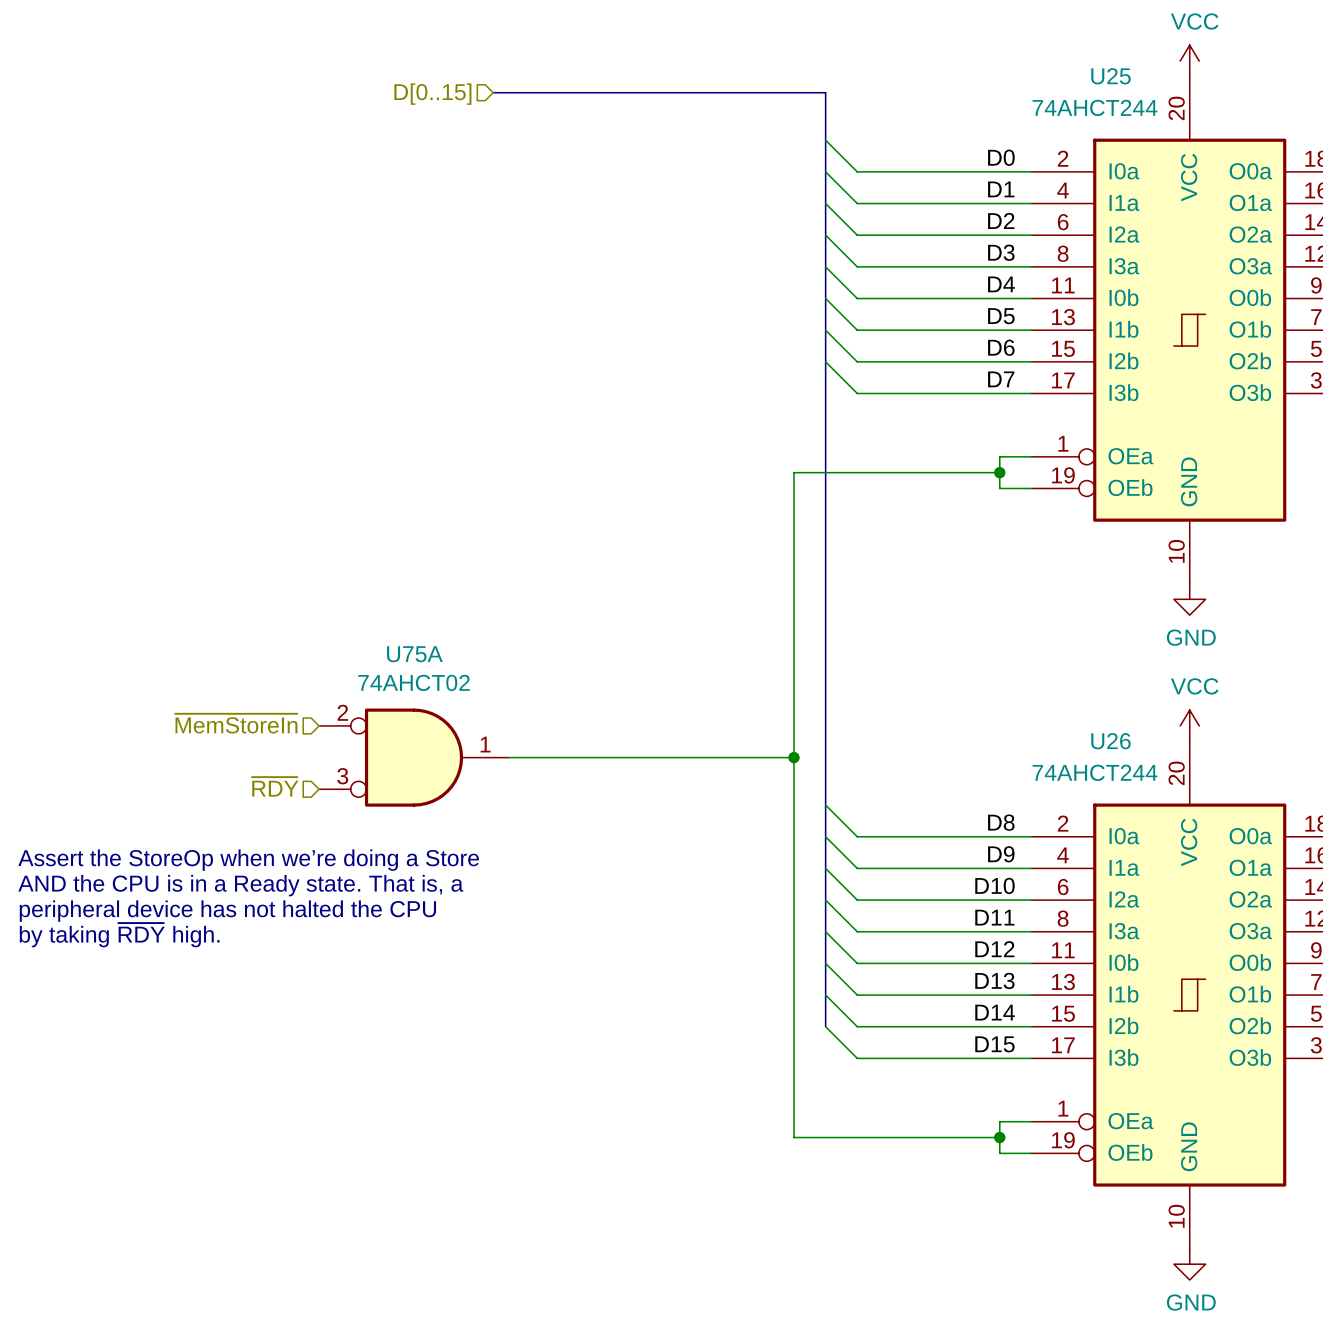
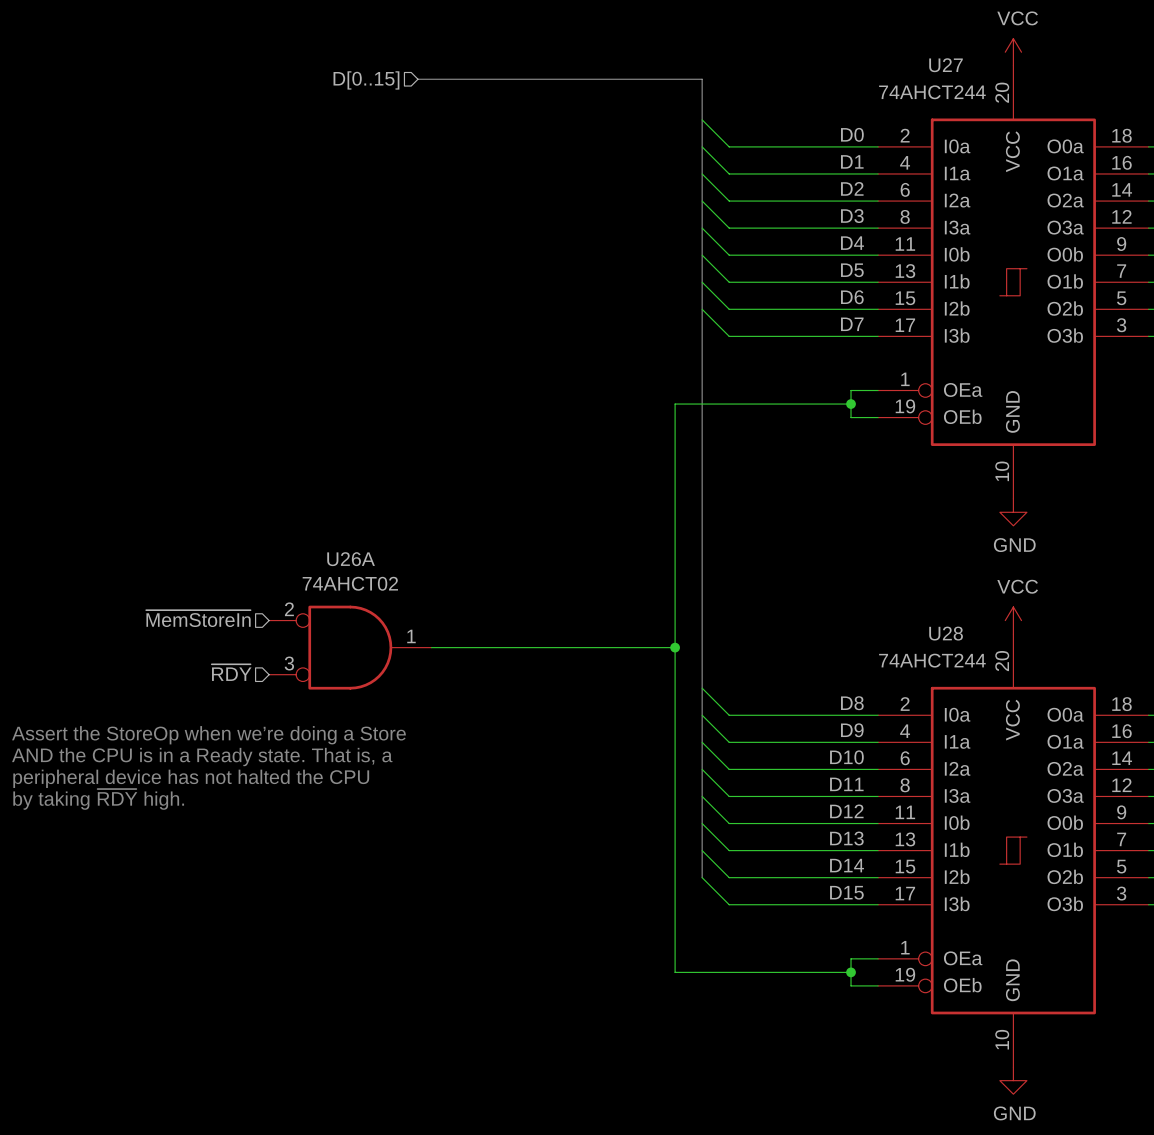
U25 name: U25 (1110, 76) -> U27 (946, 65)
U75A name: U75A (414, 654) -> U26A (351, 559)
U26 name: U26 (1110, 741) -> U28 (946, 633)

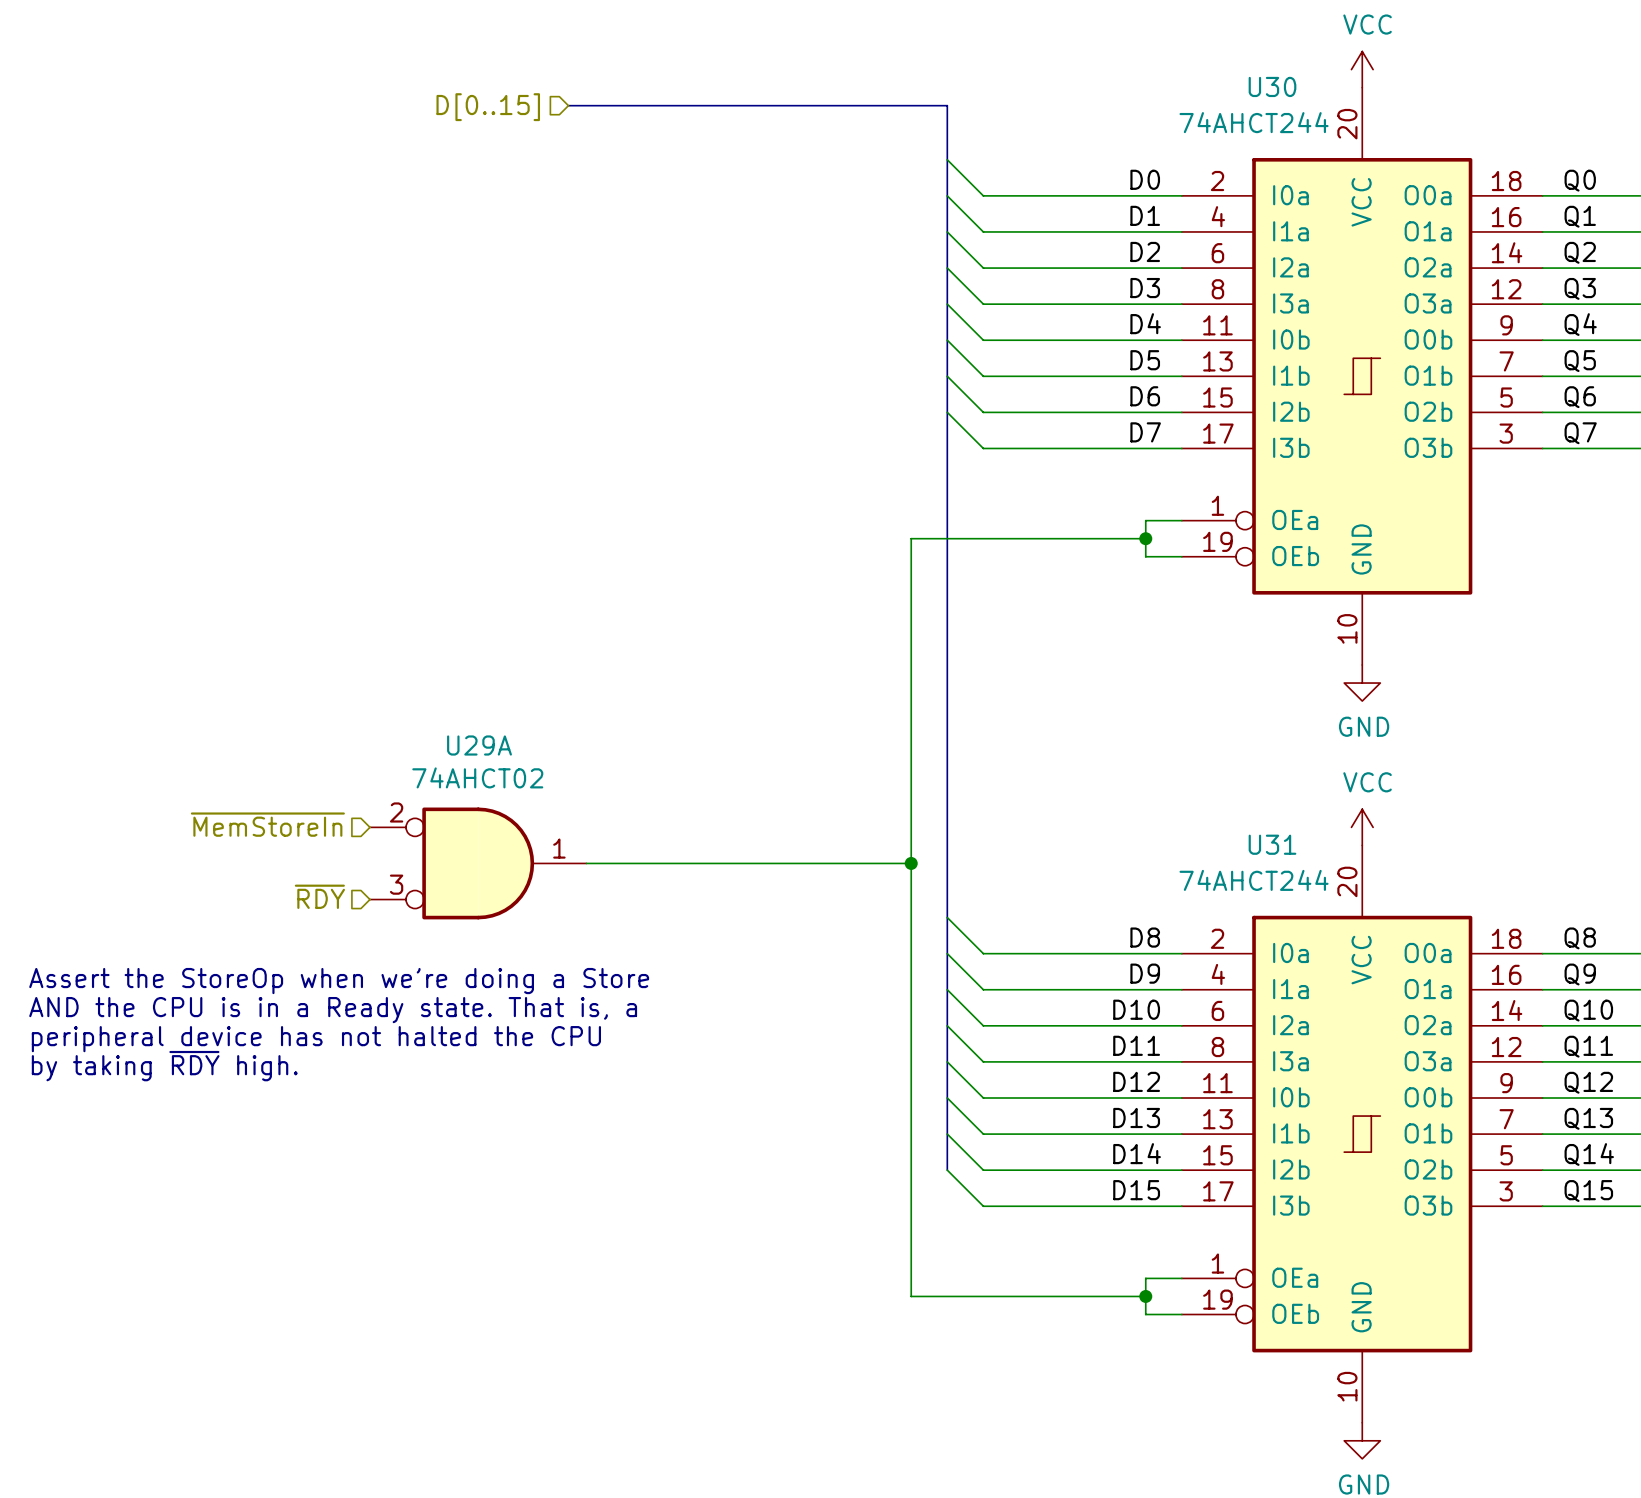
U27 name: U27 (946, 65) -> U30 (1272, 86)
U26A name: U26A (351, 559) -> U29A (479, 745)
U28 name: U28 (946, 633) -> U31 (1272, 844)

